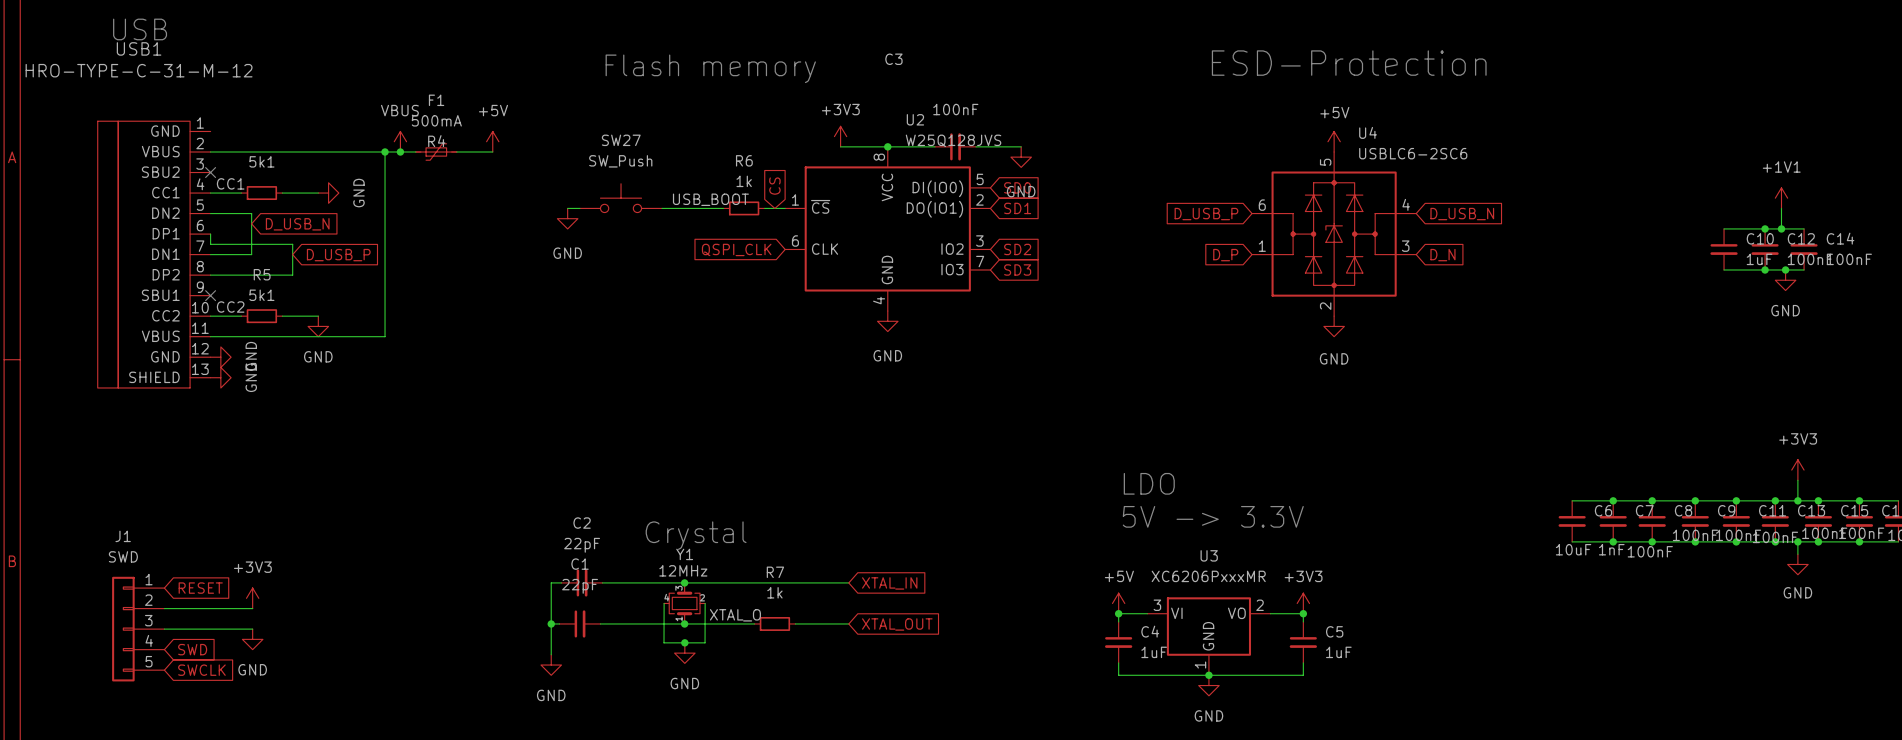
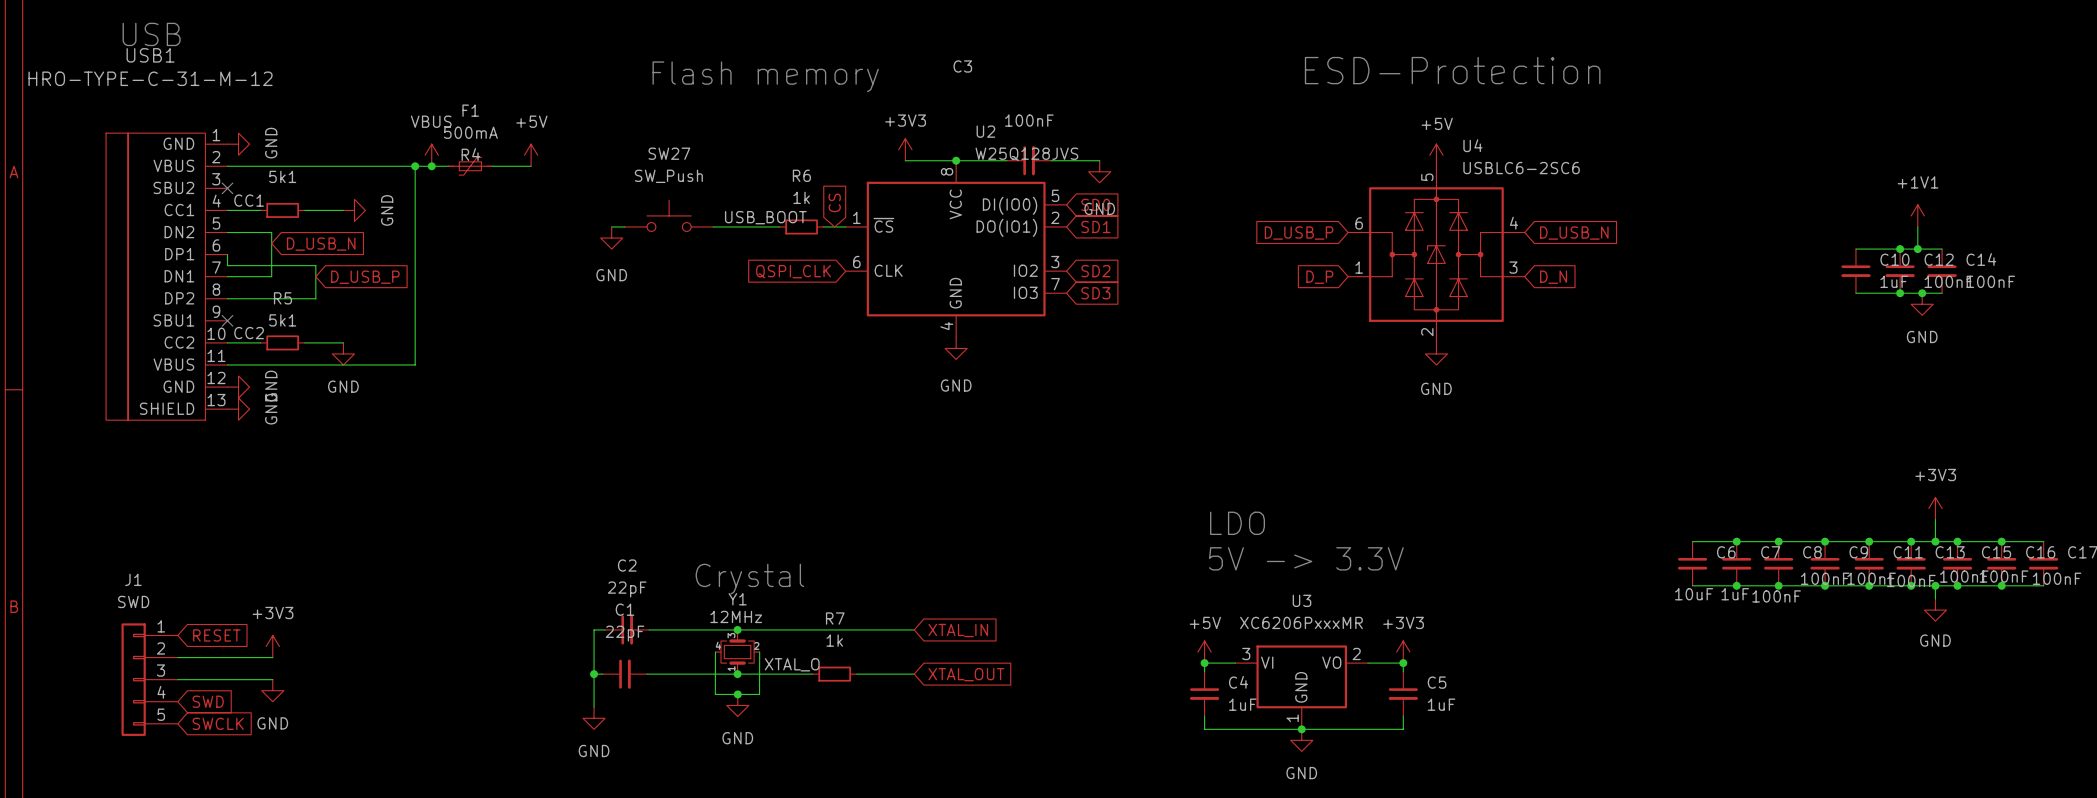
power symbol: none -> GND (238, 144)
C7 value: 1nF (1611, 549) -> 1uF (1735, 594)

